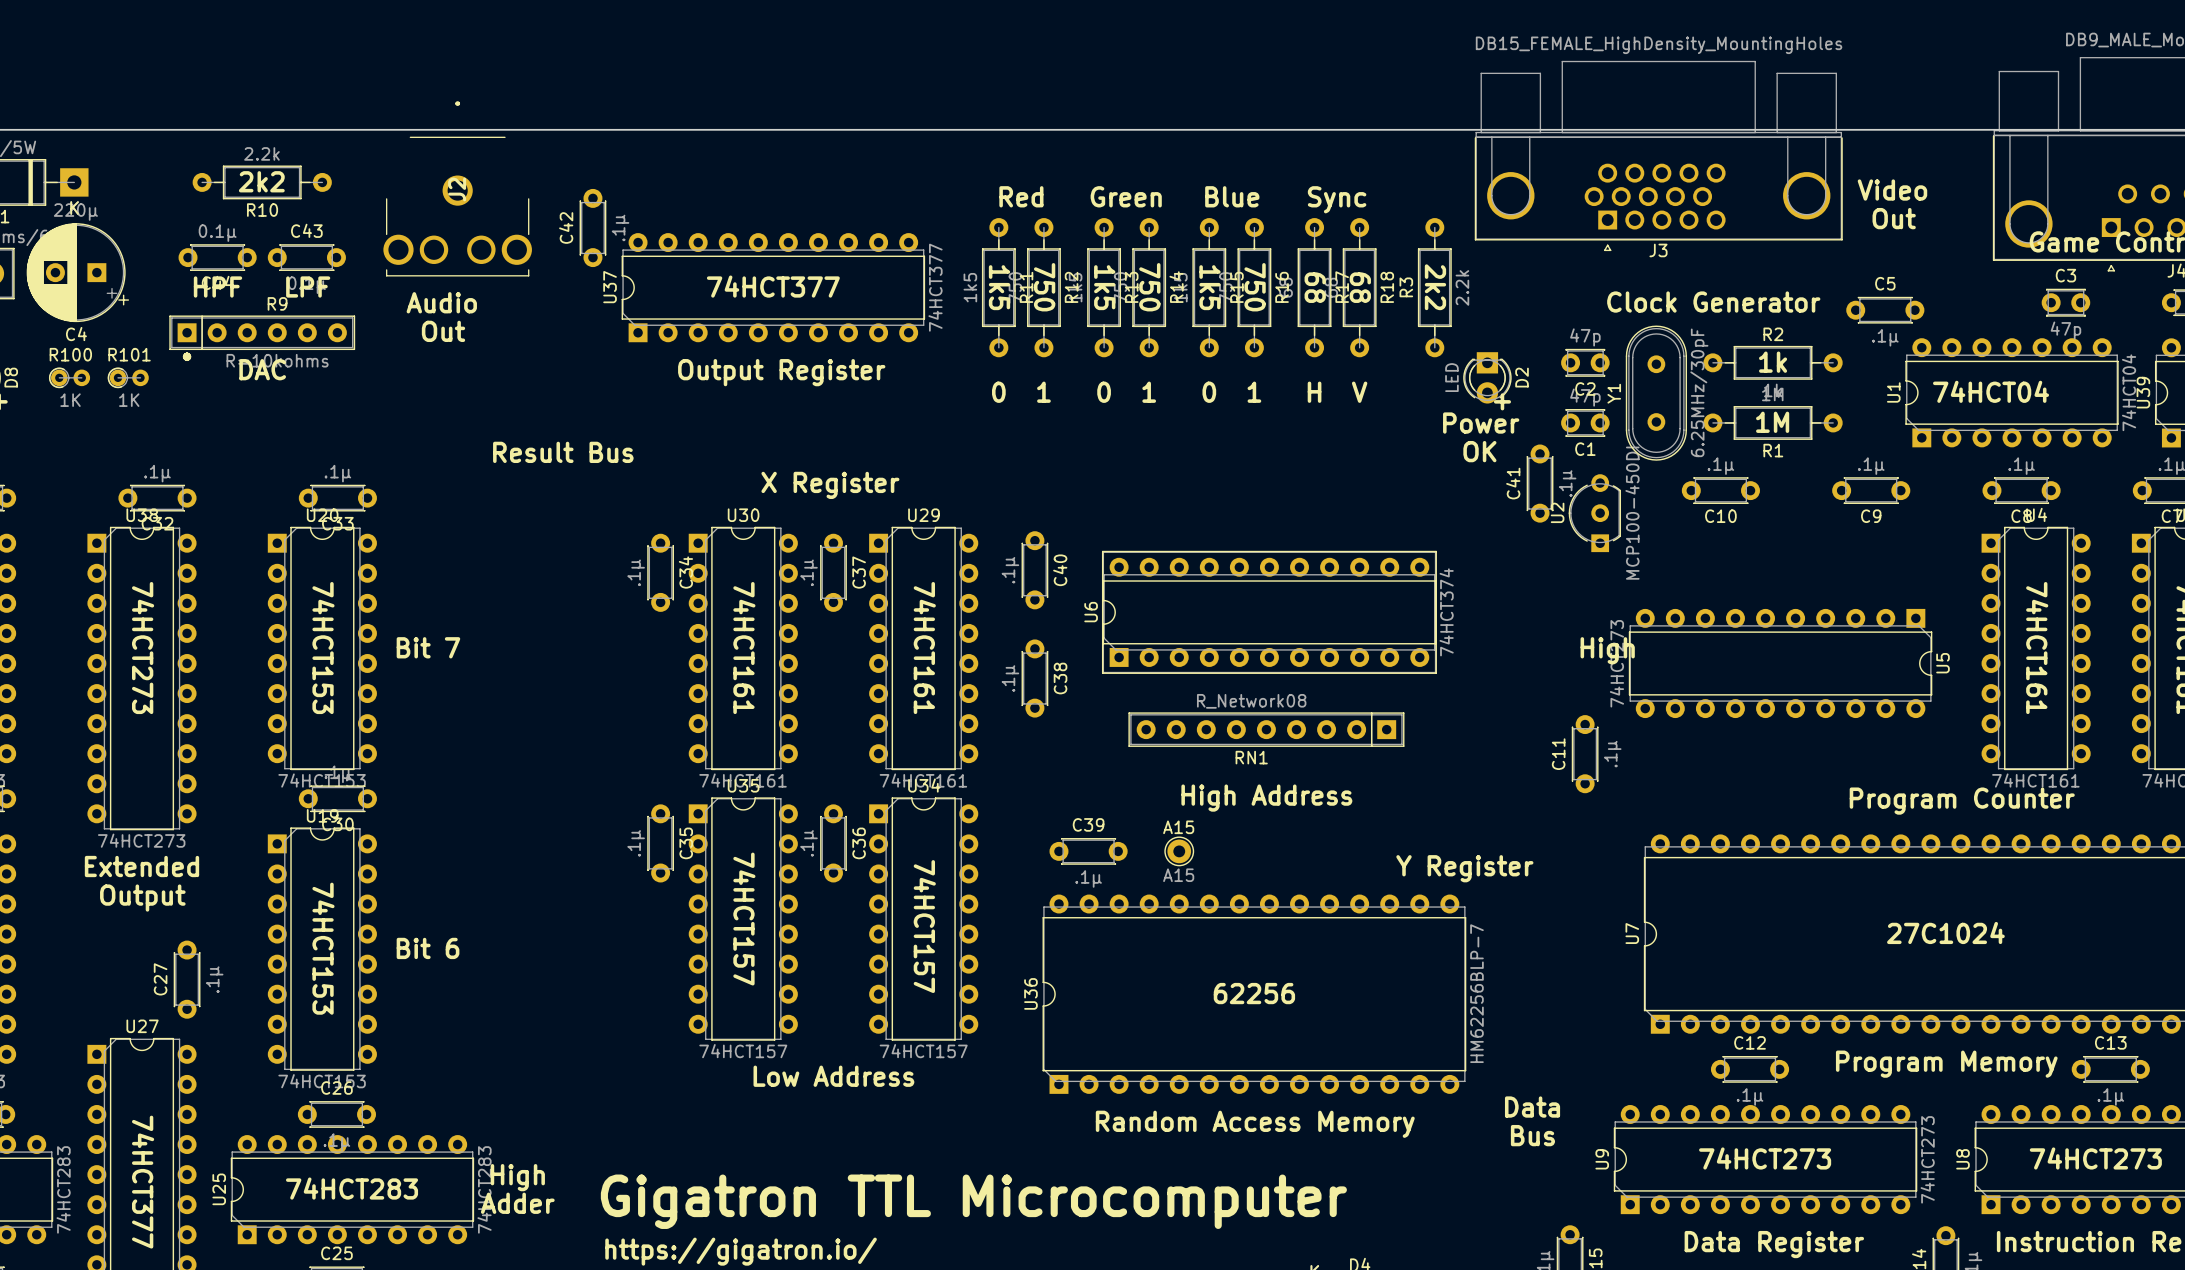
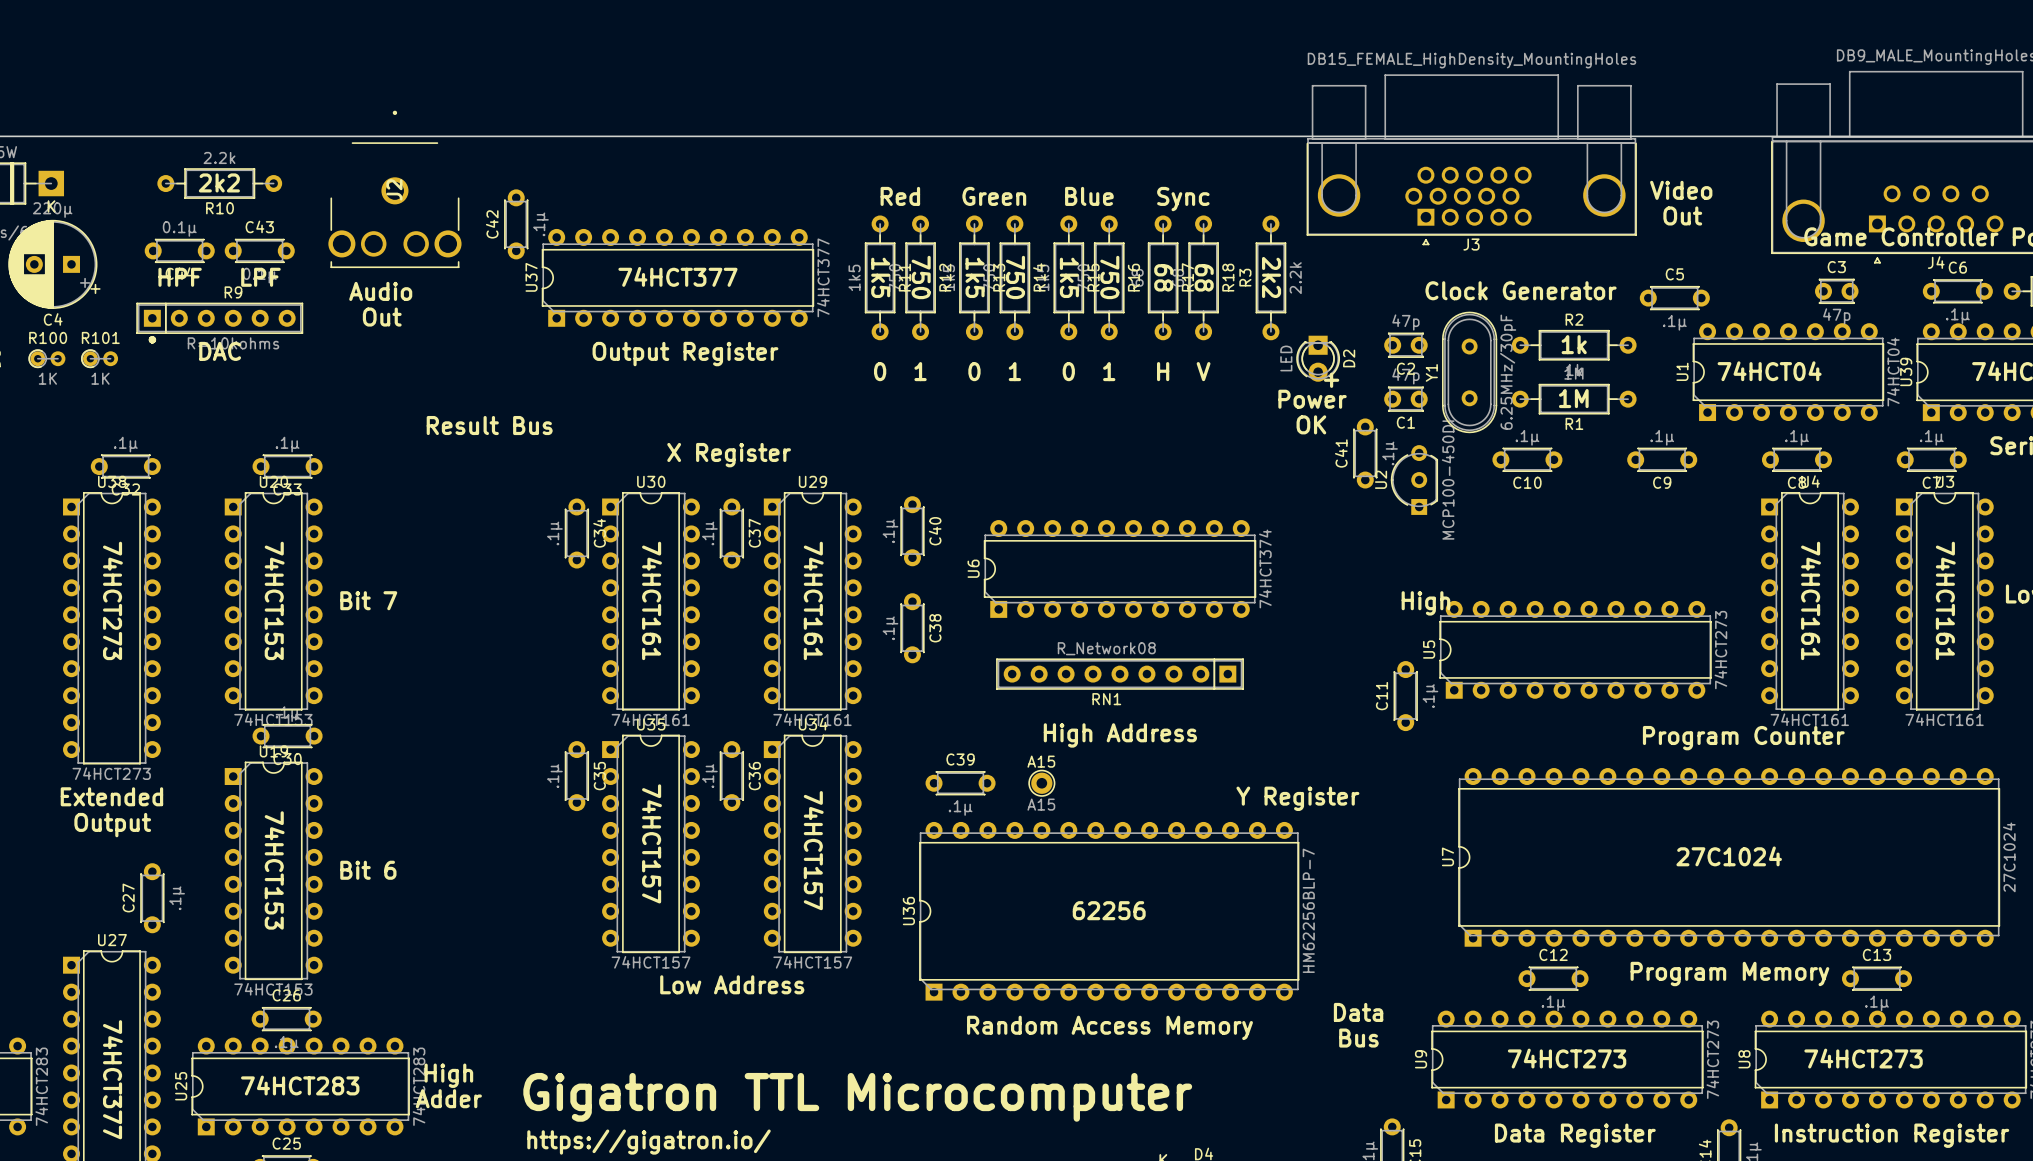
U6 footprint: [1101, 550, 1437, 674] -> [983, 520, 1257, 618]
U5 rotation: 0° (1780, 663) -> 180° (1575, 649)

